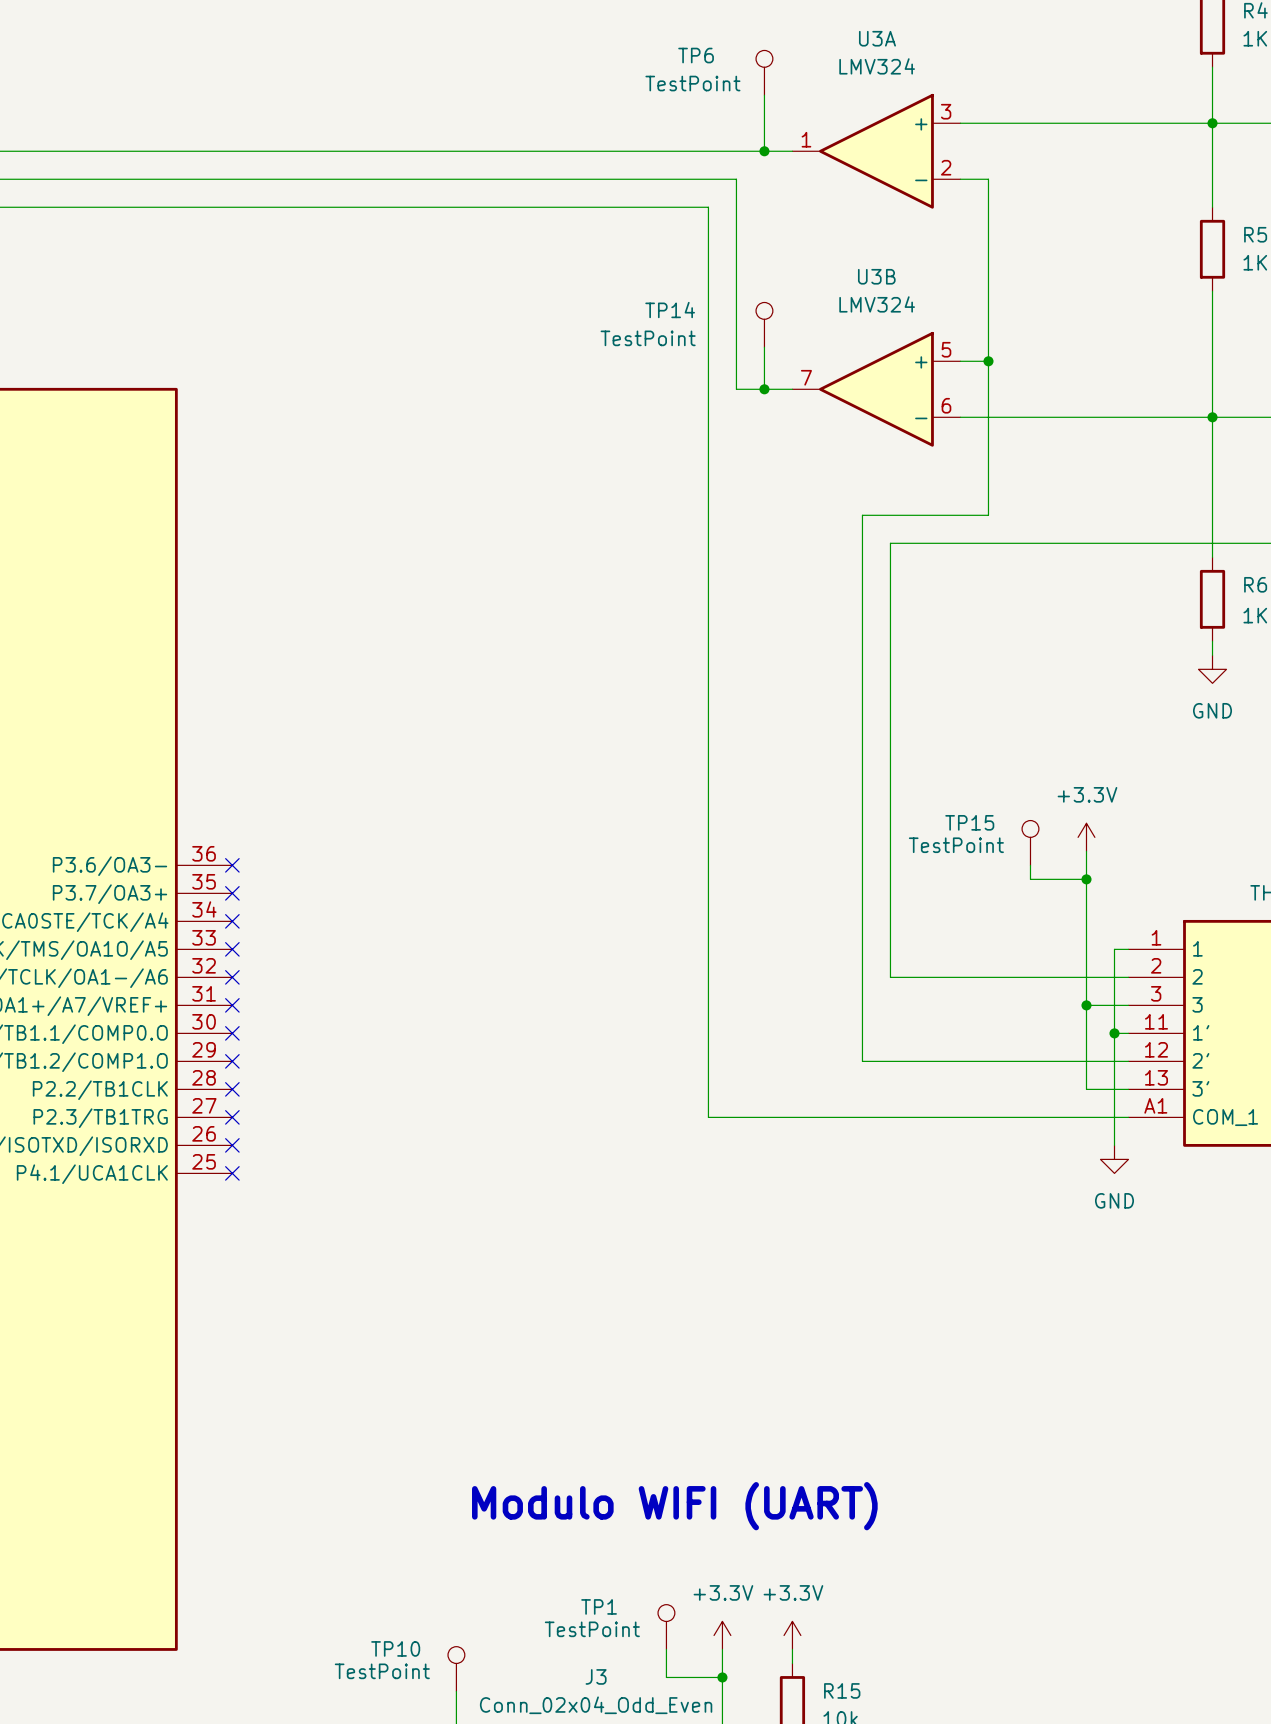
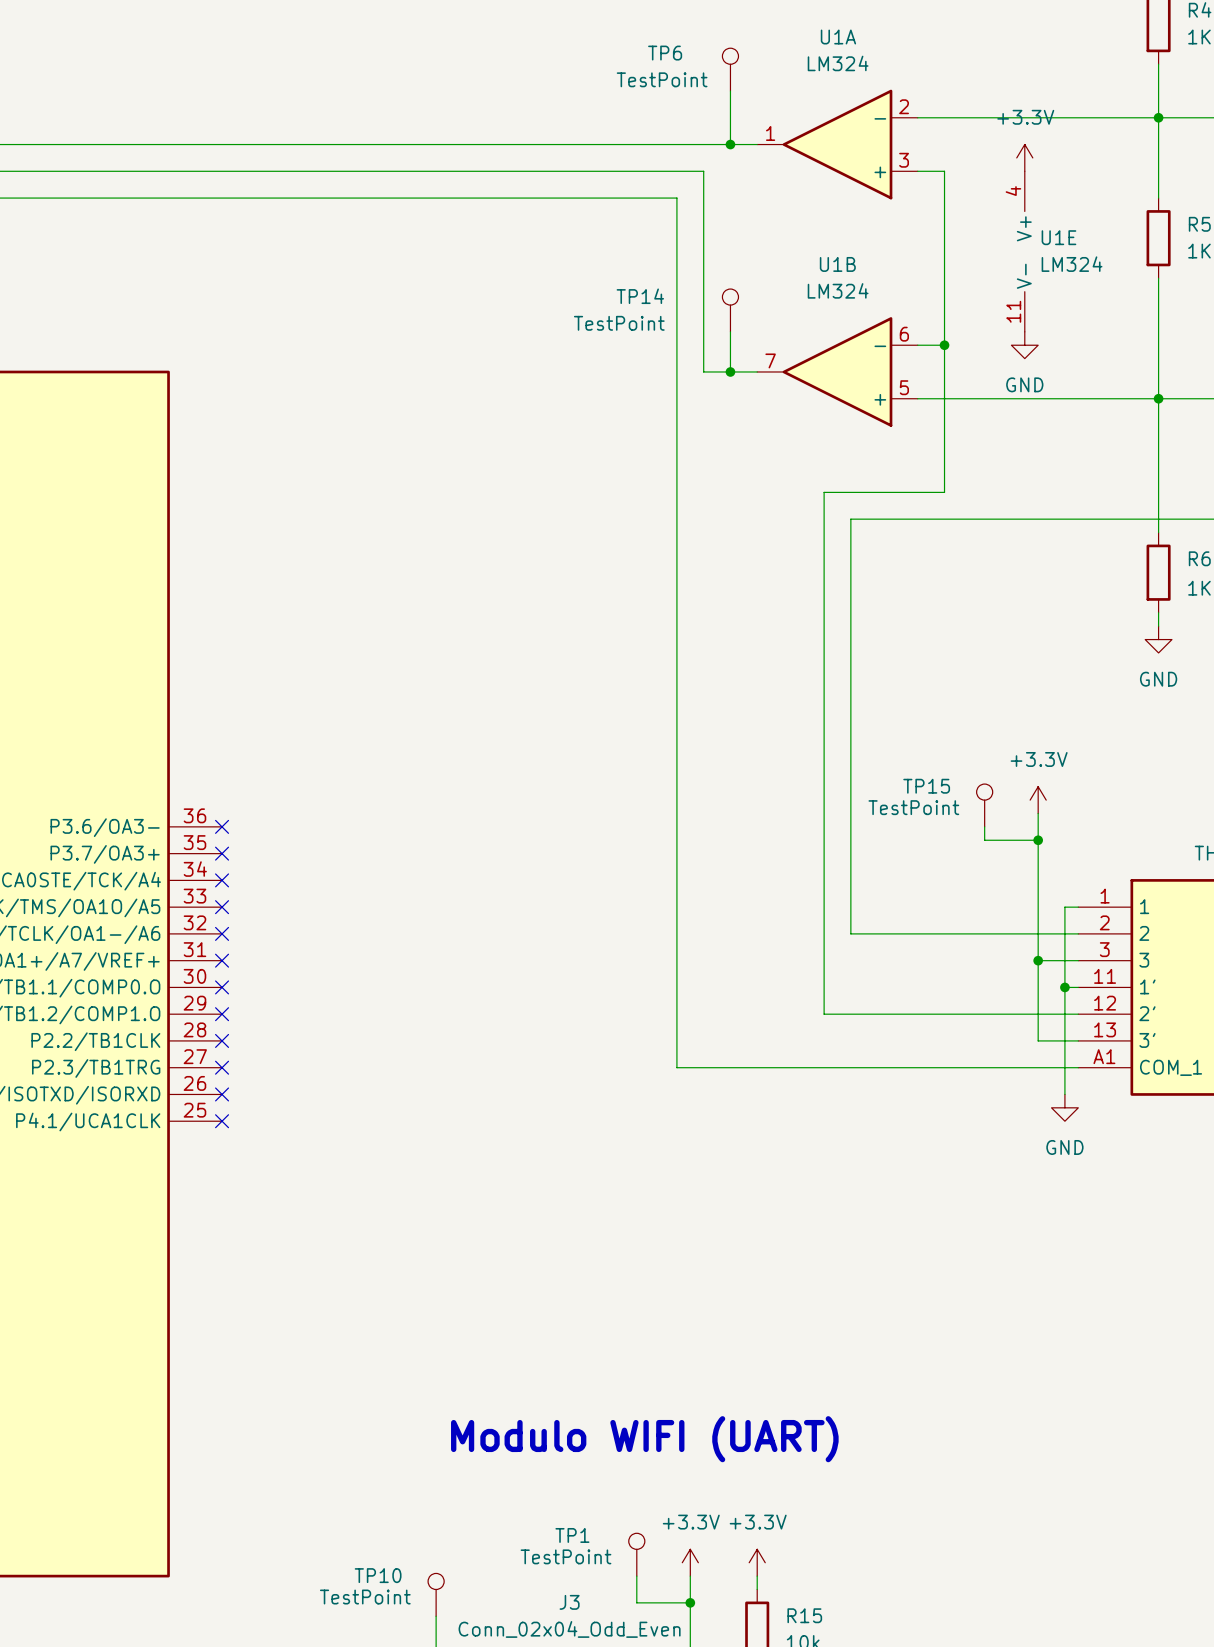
U3A name: U3A (877, 38) -> U1A (838, 37)
U3A value: LMV324 (877, 66) -> LM324 (838, 63)
U3A flip: as is (876, 151) -> up-down (837, 144)
power symbol: none -> +3.3V (1024, 157)
U1E: none -> LM324 (1024, 251)
U3B name: U3B (876, 276) -> U1B (837, 264)
U3B value: LMV324 (877, 304) -> LM324 (838, 290)
power symbol: none -> GND (1024, 345)
U3B flip: as is (876, 389) -> up-down (837, 371)

